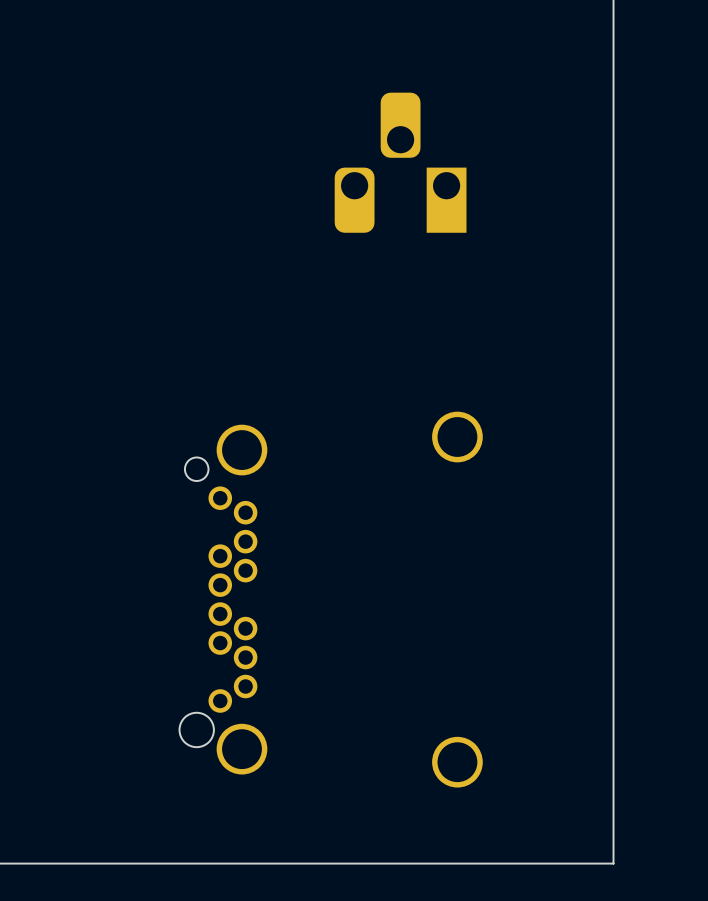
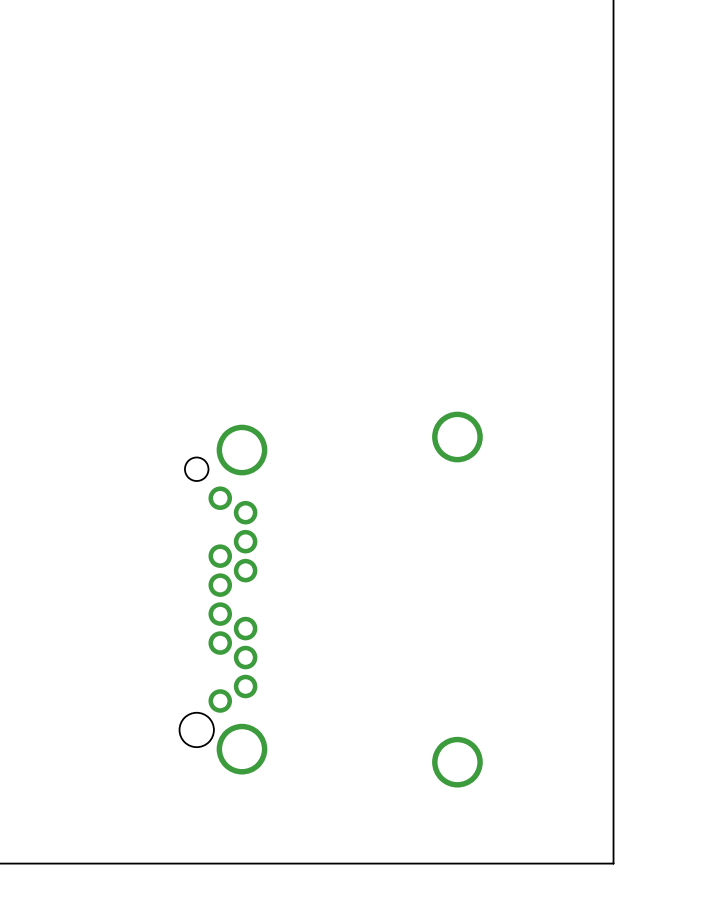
part: (400, 162) -> none

